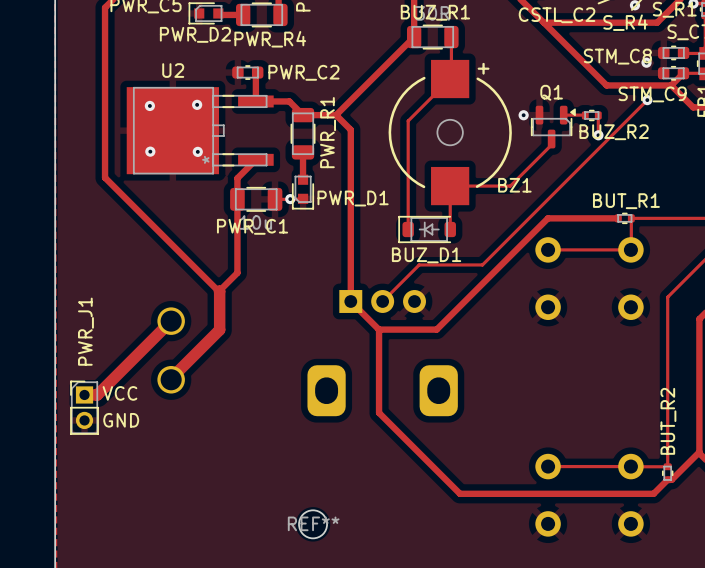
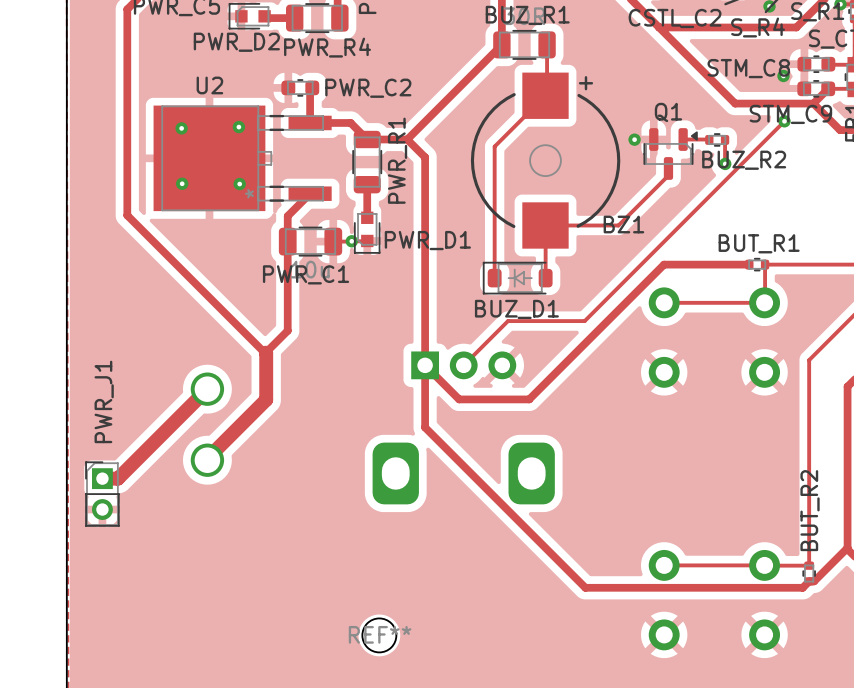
track: (379, 329) (379, 412) (459, 493) (653, 493) (662, 485) -> (425, 365) (425, 427) (585, 587) (802, 587)
text: VCC (119, 393) -> none
text: GND (121, 420) -> none

